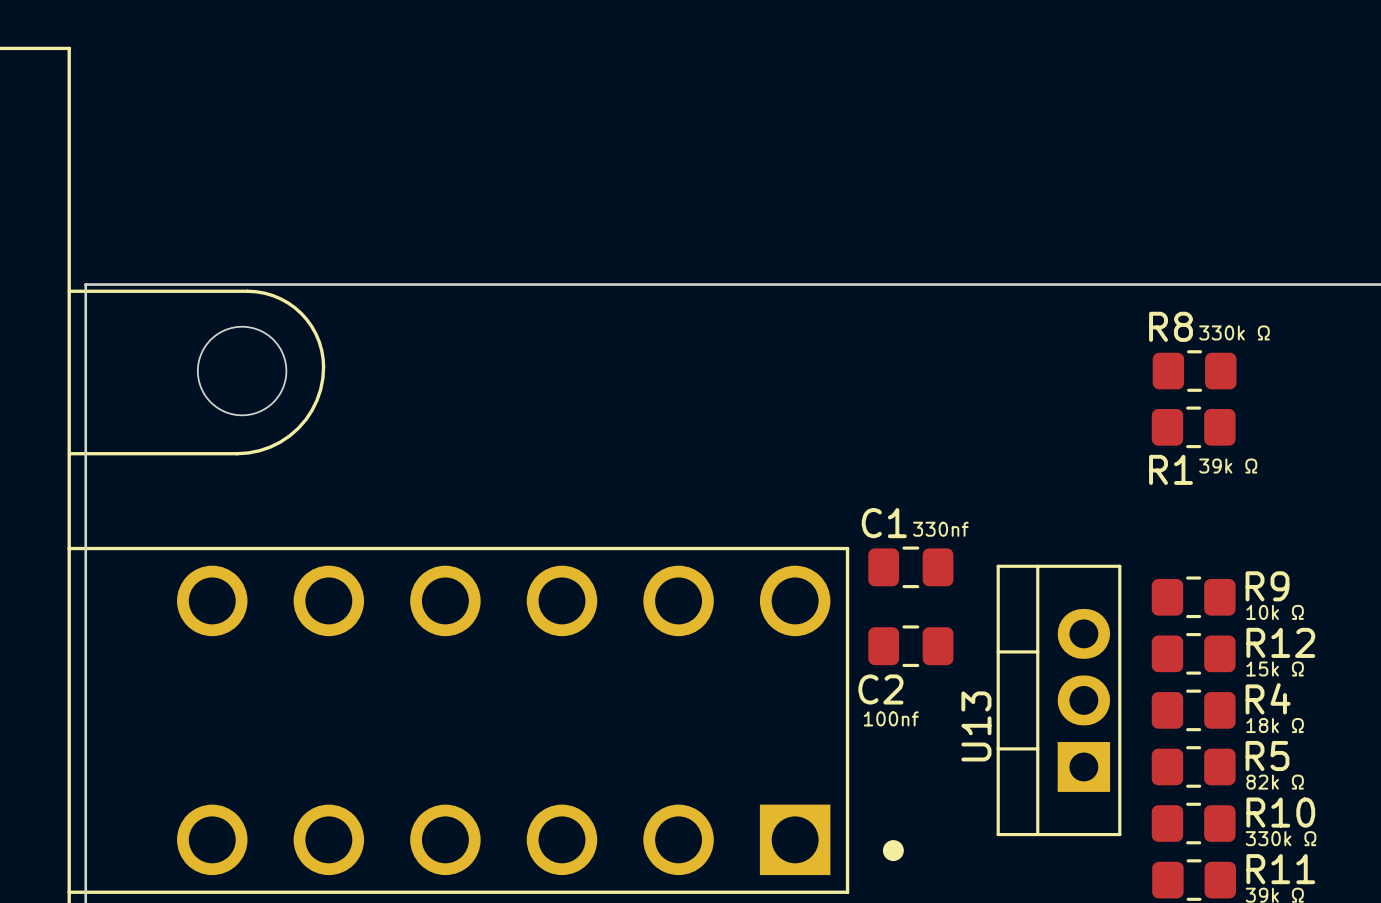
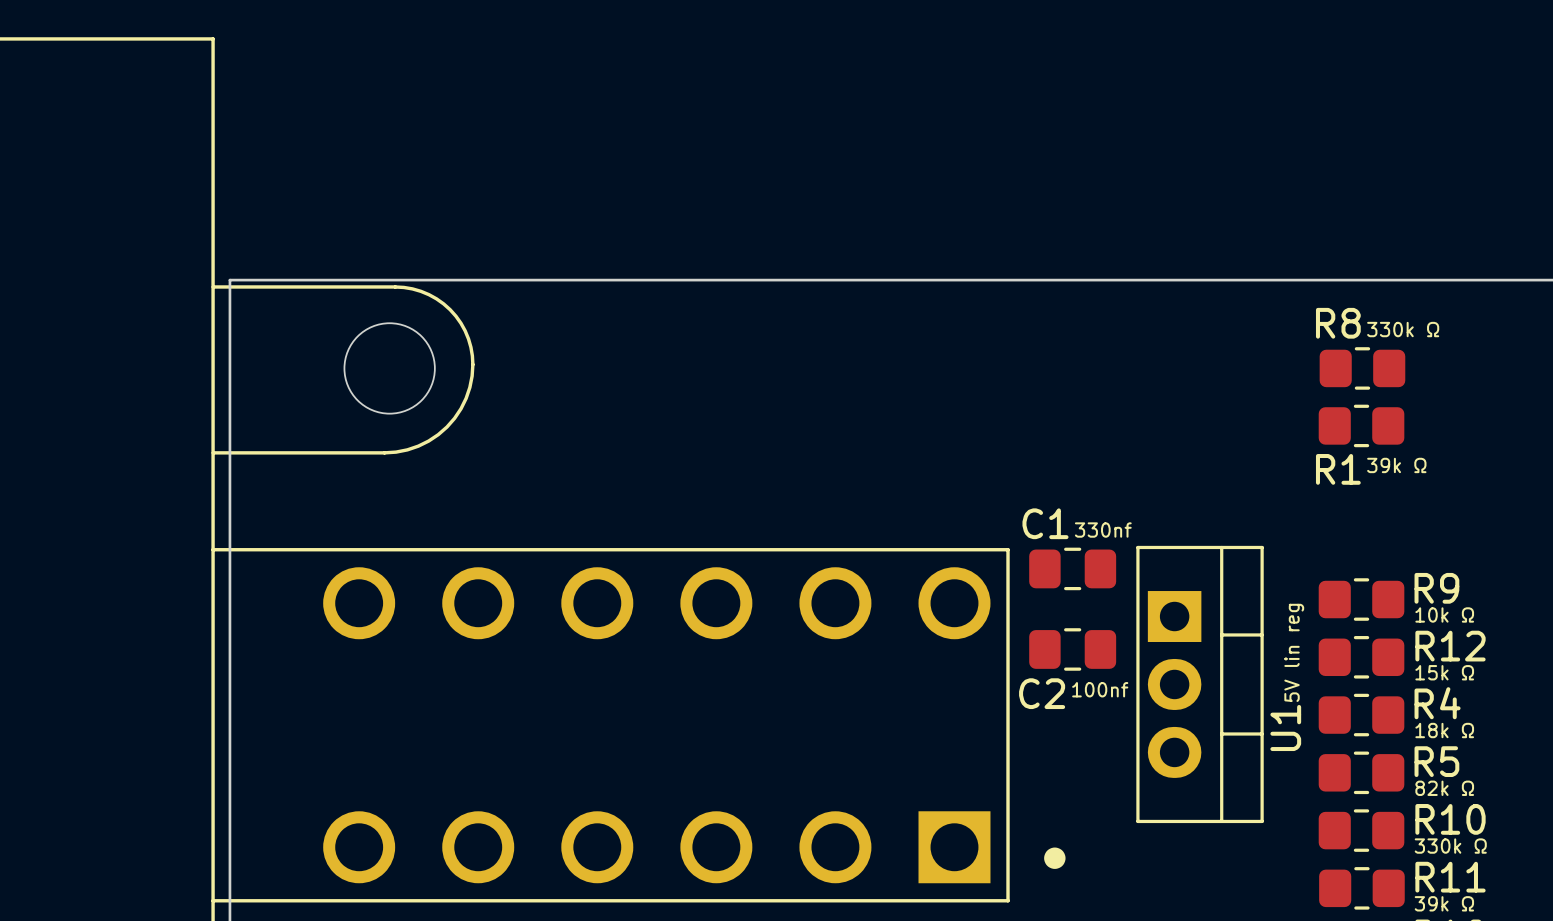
text: none -> 5V lin reg (1294, 652)
U1: none -> (1200, 684)
U13: (1059, 700) -> none
text position: 100nf (891, 718) -> 100nf (1100, 689)

